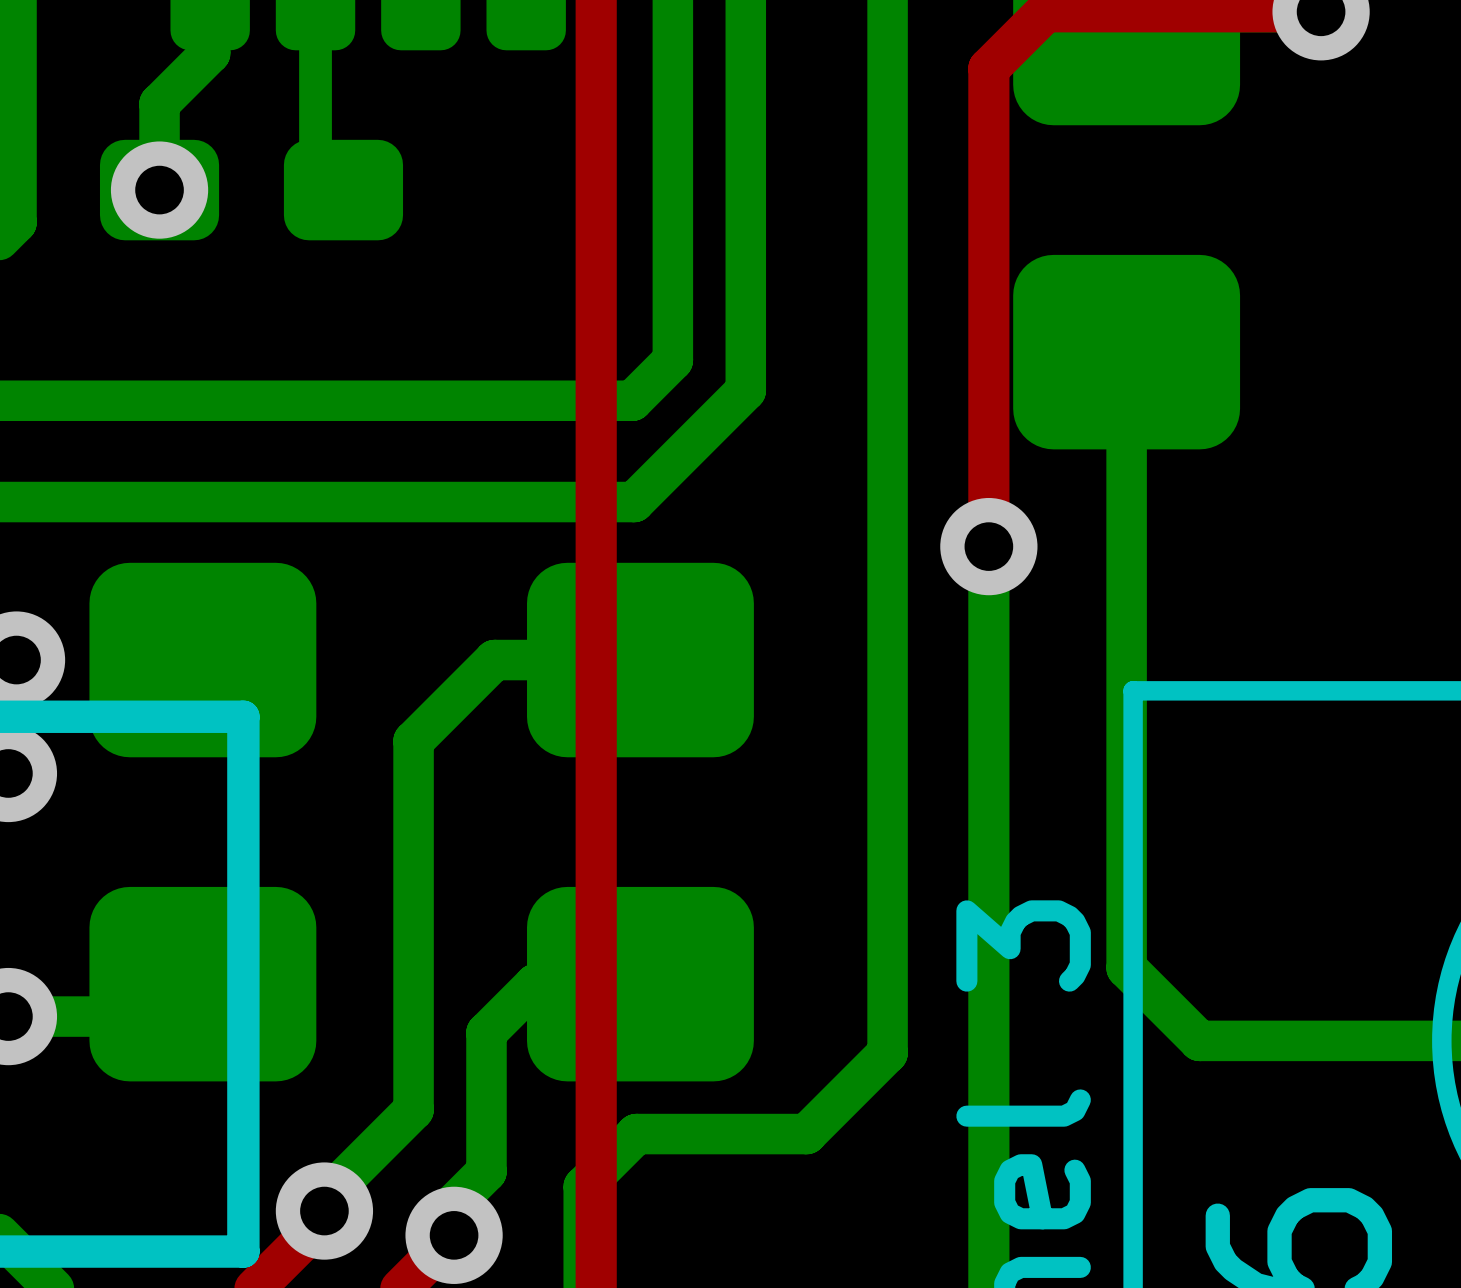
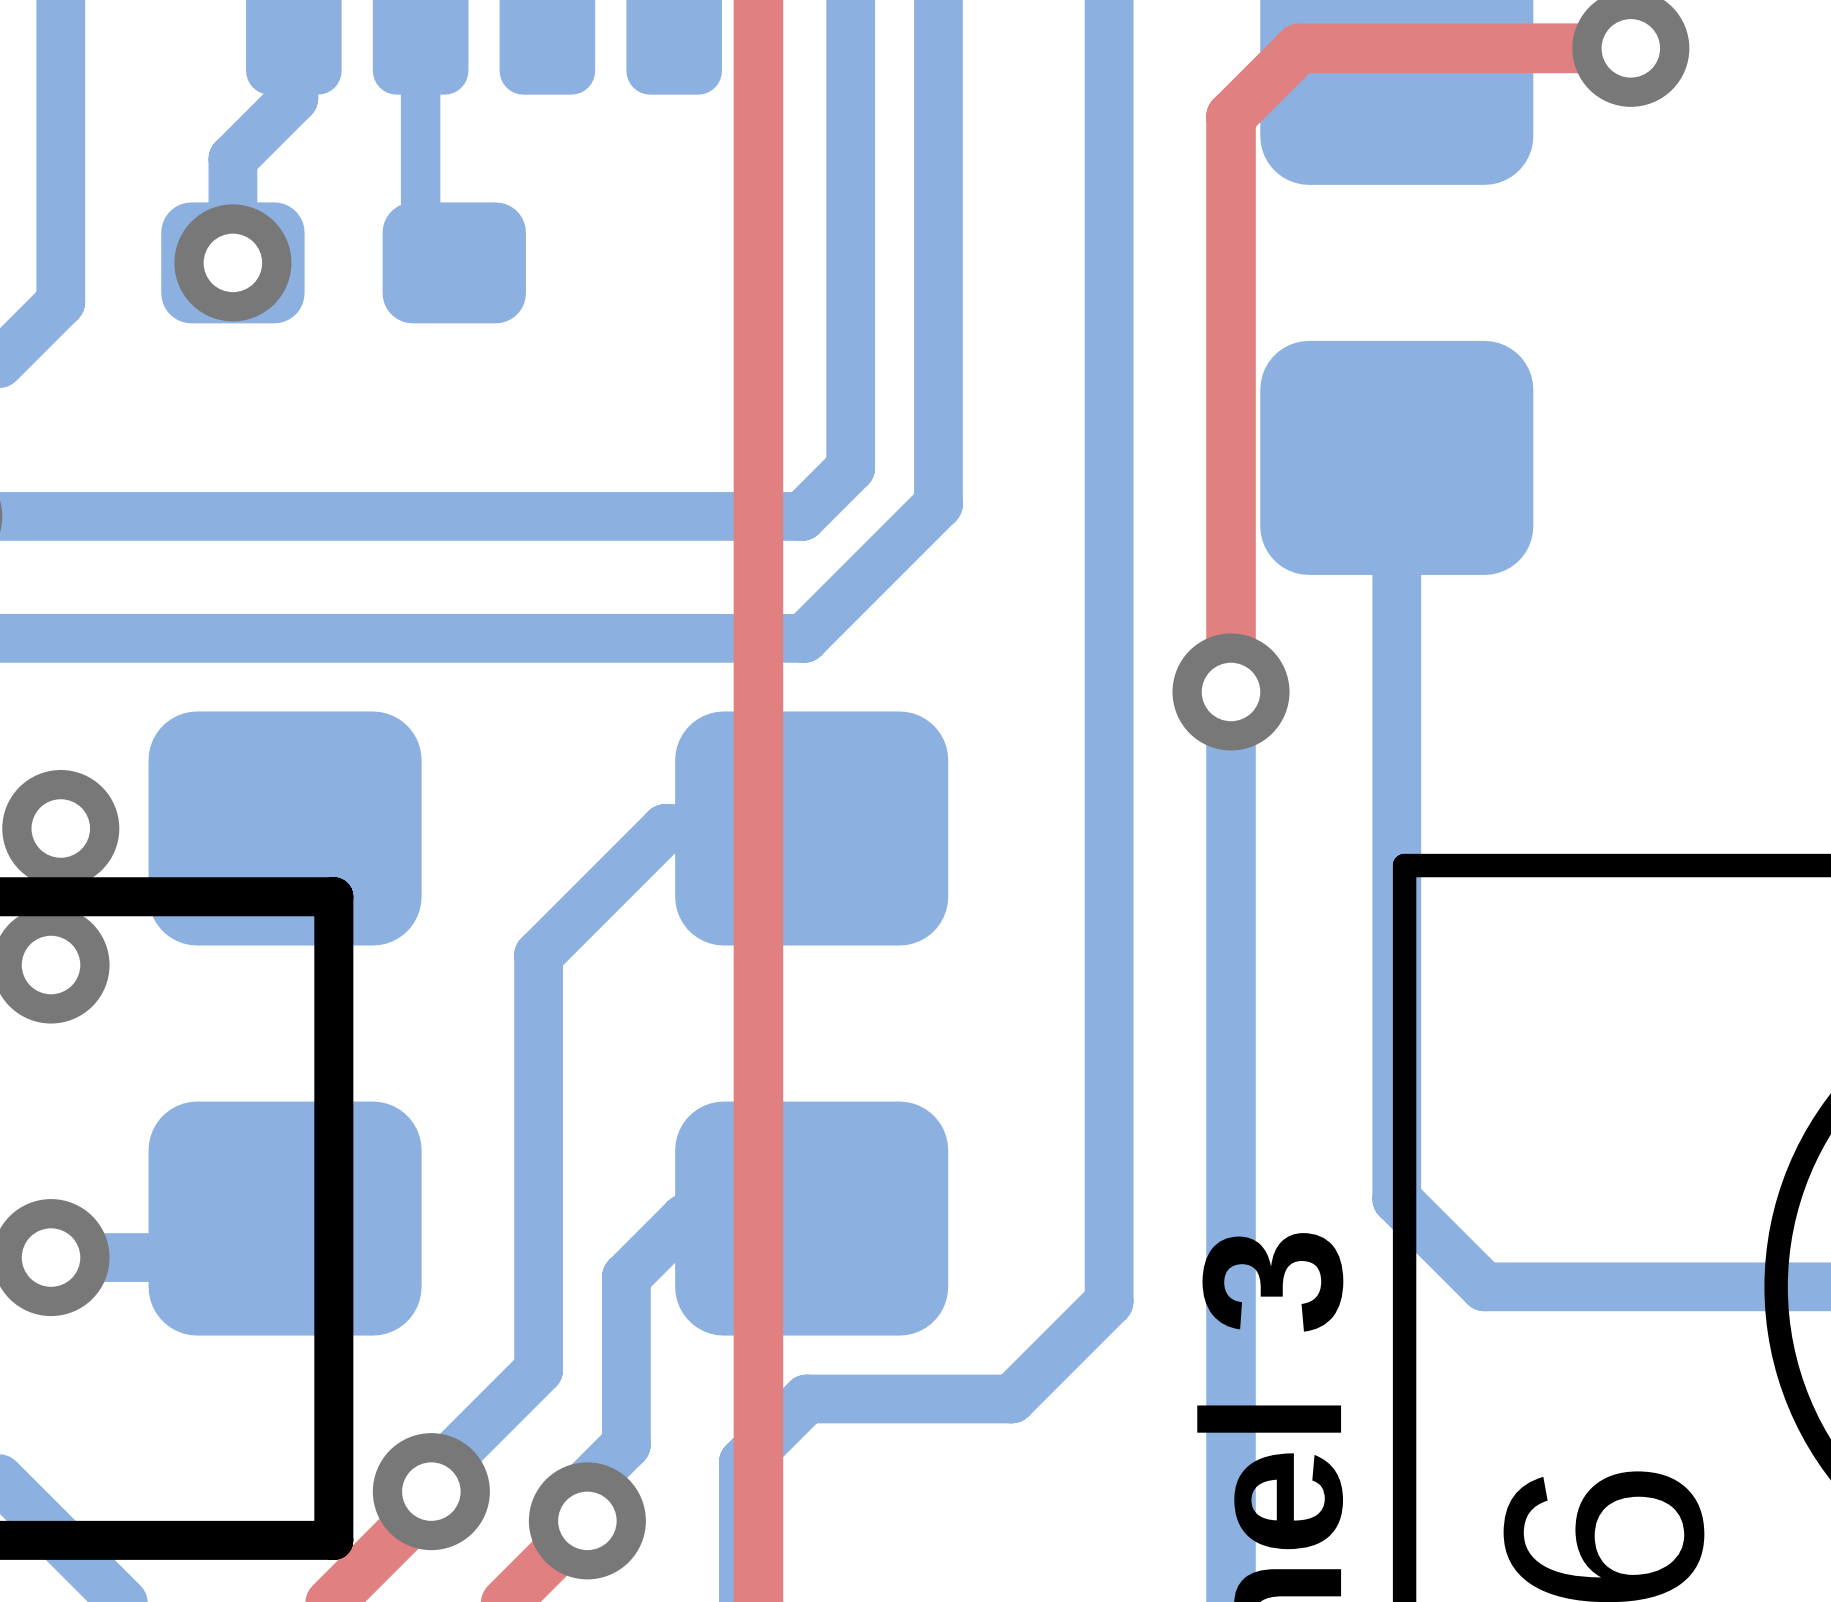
bottom track: (518, 660) (494, 660) (413, 741) (413, 765) -> (665, 828) (538, 955)

